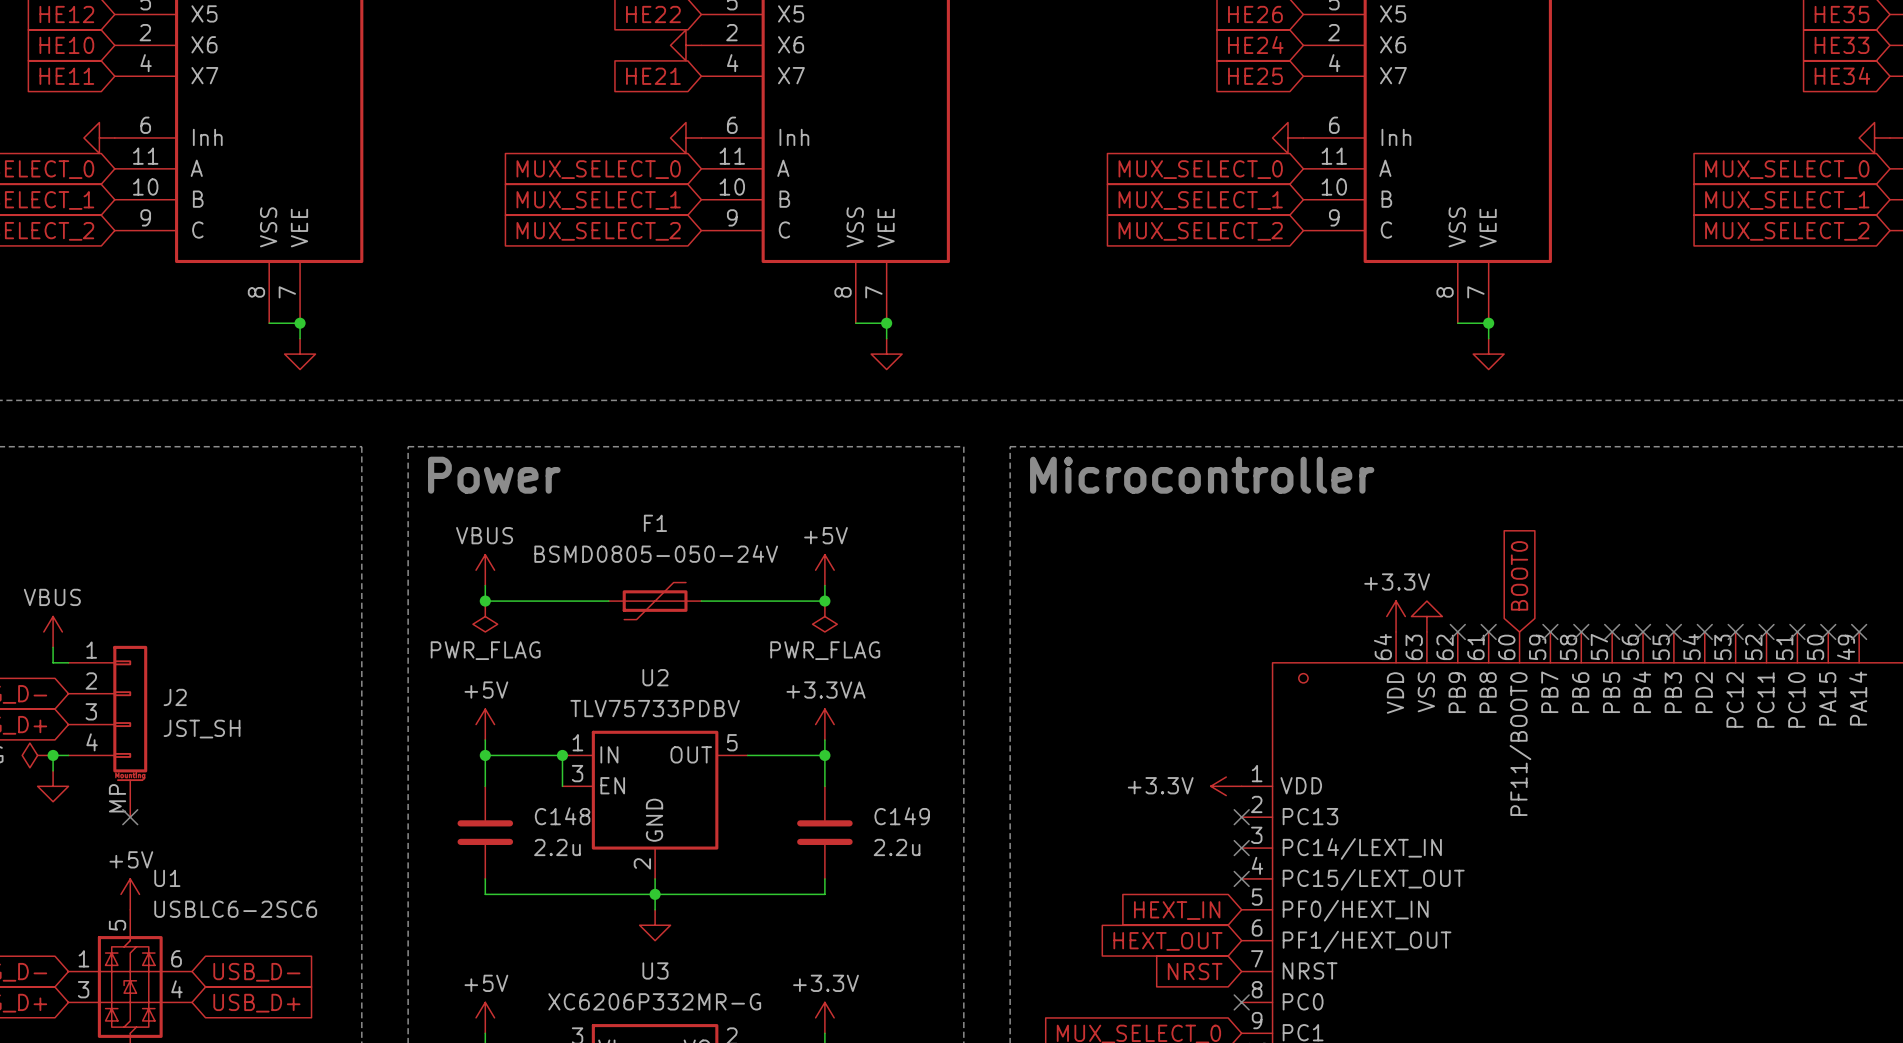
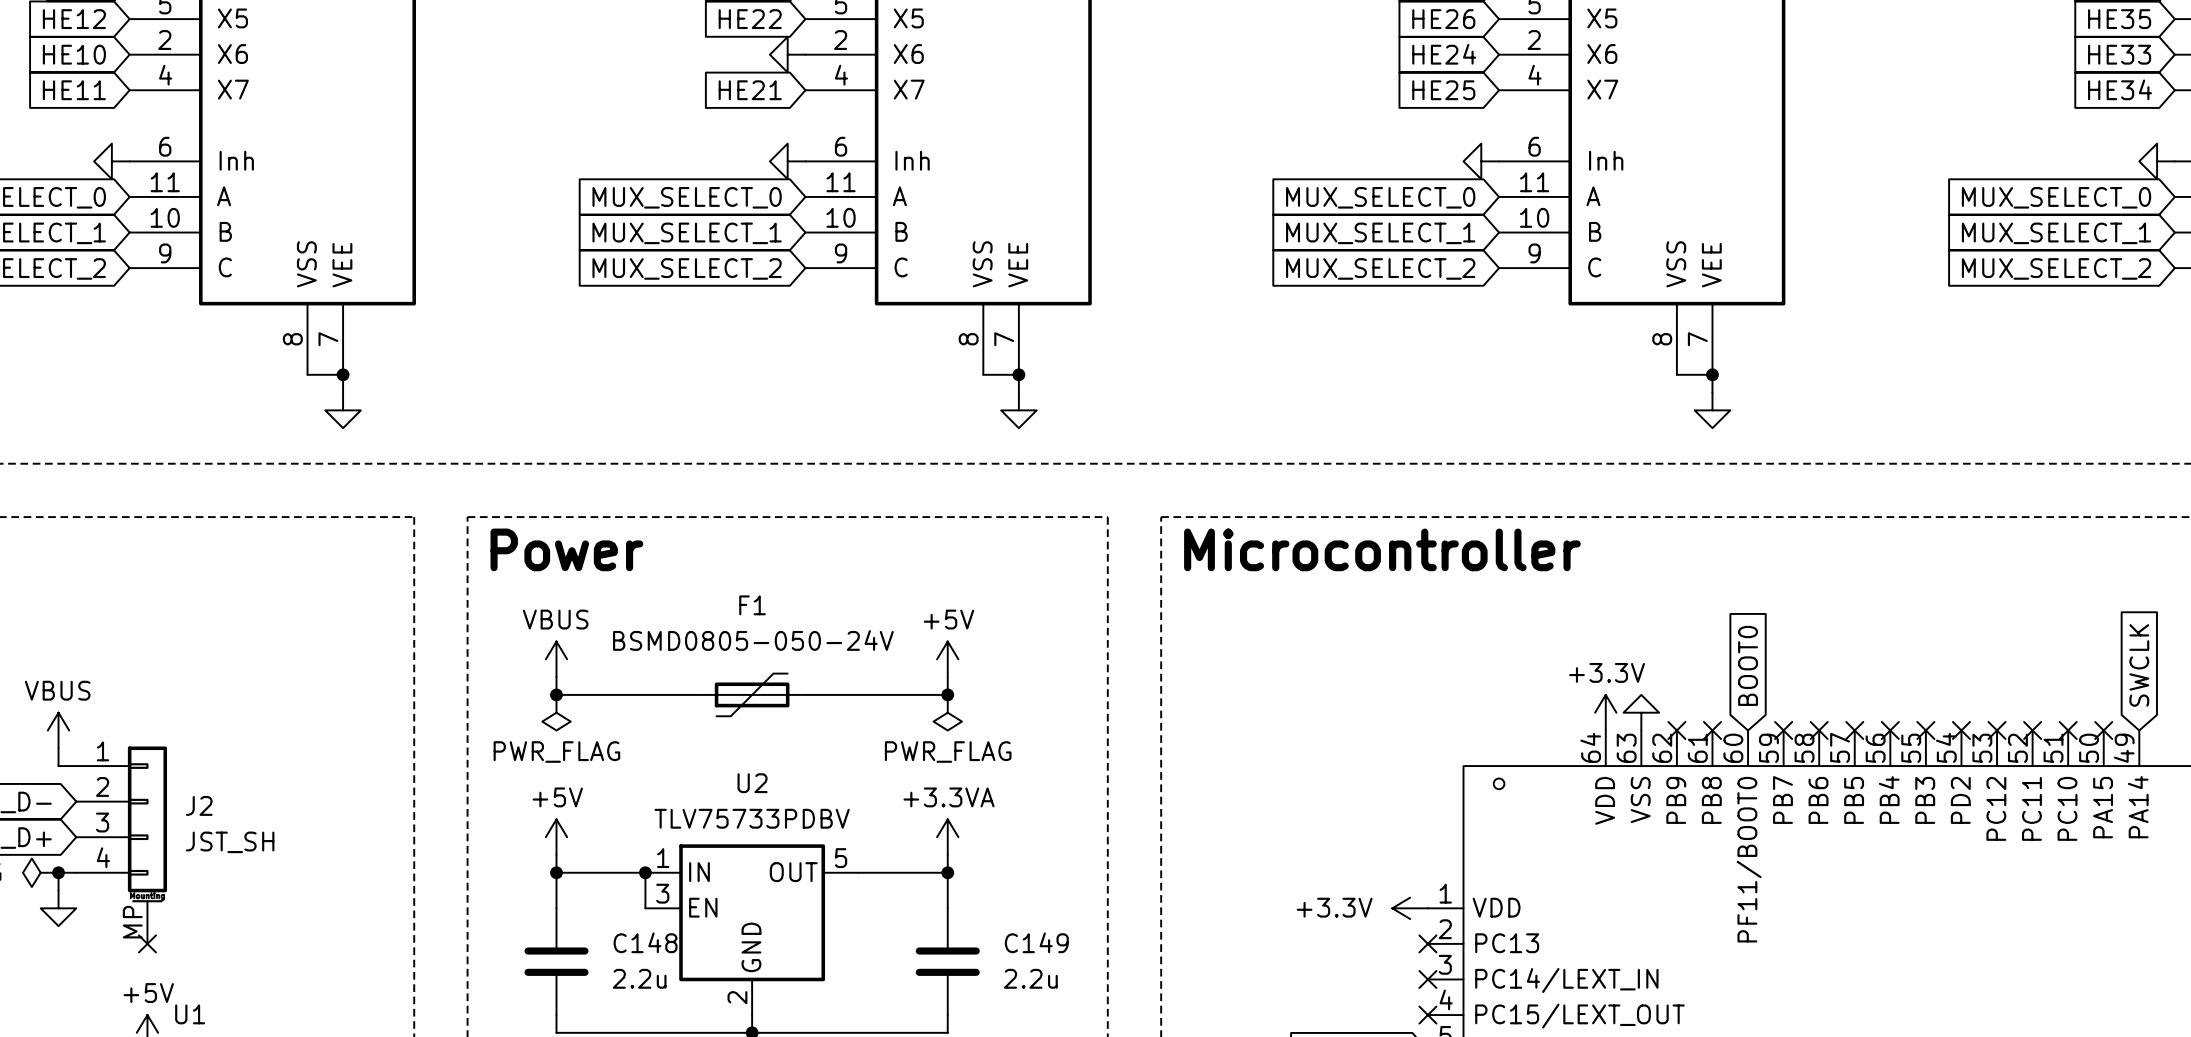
global label: none -> SWCLK (2139, 665)
no-connect mark: (1859, 631) -> none

